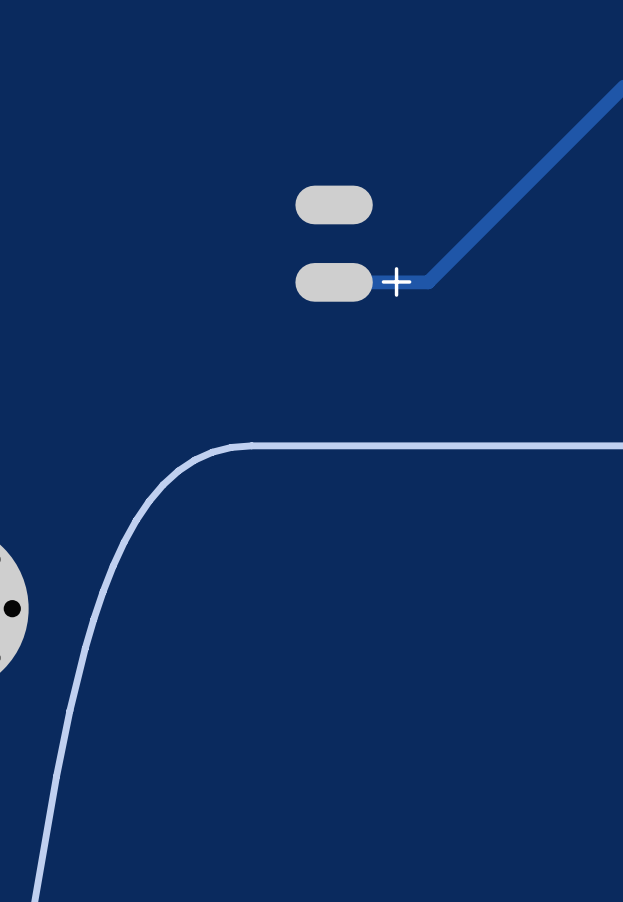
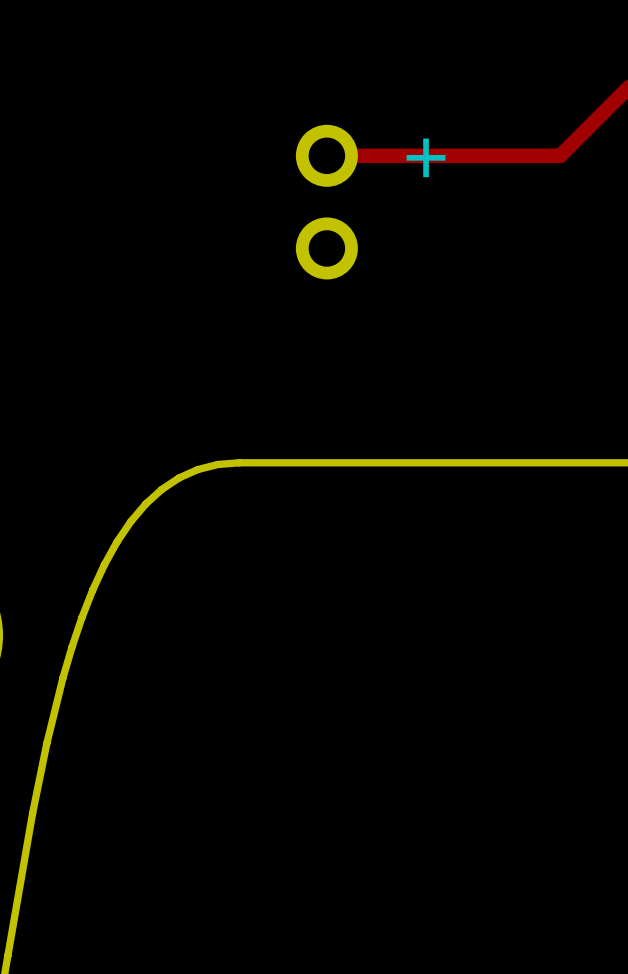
track: (554, 156) (428, 282) (334, 282) -> (560, 155) (326, 155)
part: none -> (326, 202)
part: (334, 243) -> none

